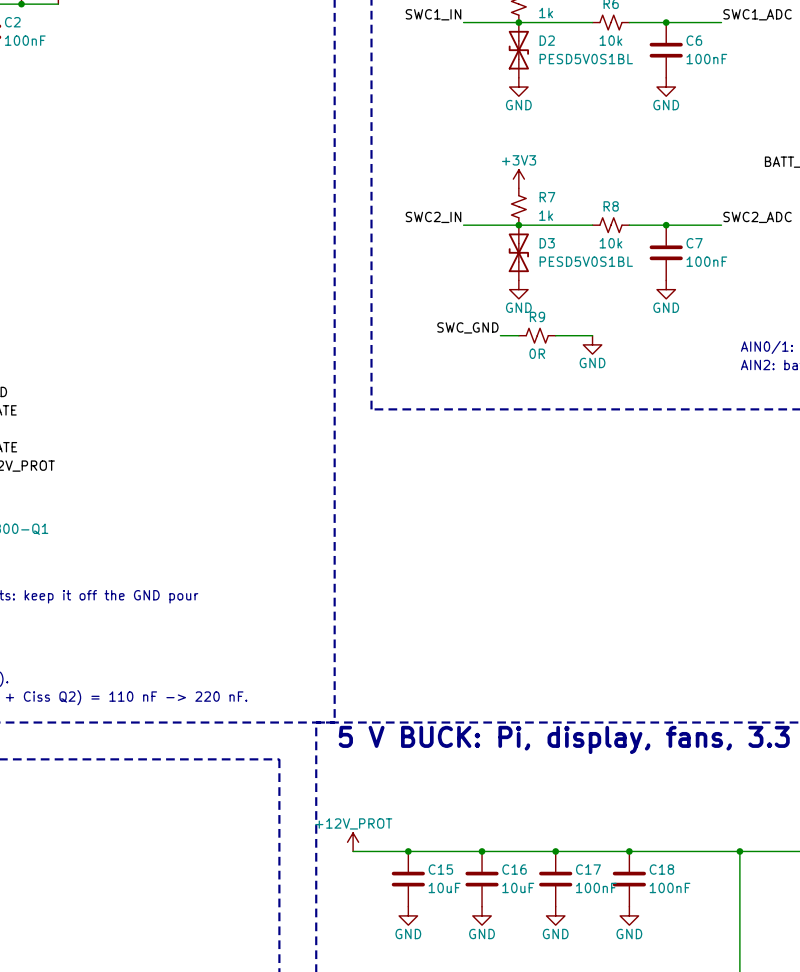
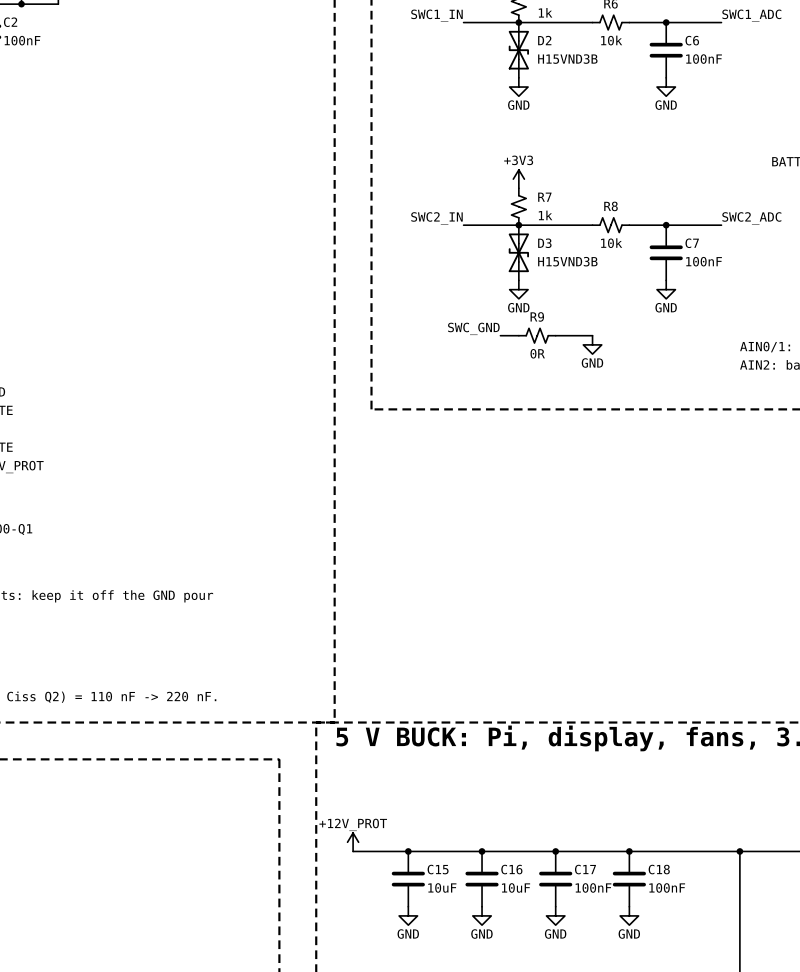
D2 value: PESD5V0S1BL (586, 59) -> H15VND3B (567, 59)
D3 value: PESD5V0S1BL (586, 261) -> H15VND3B (567, 261)

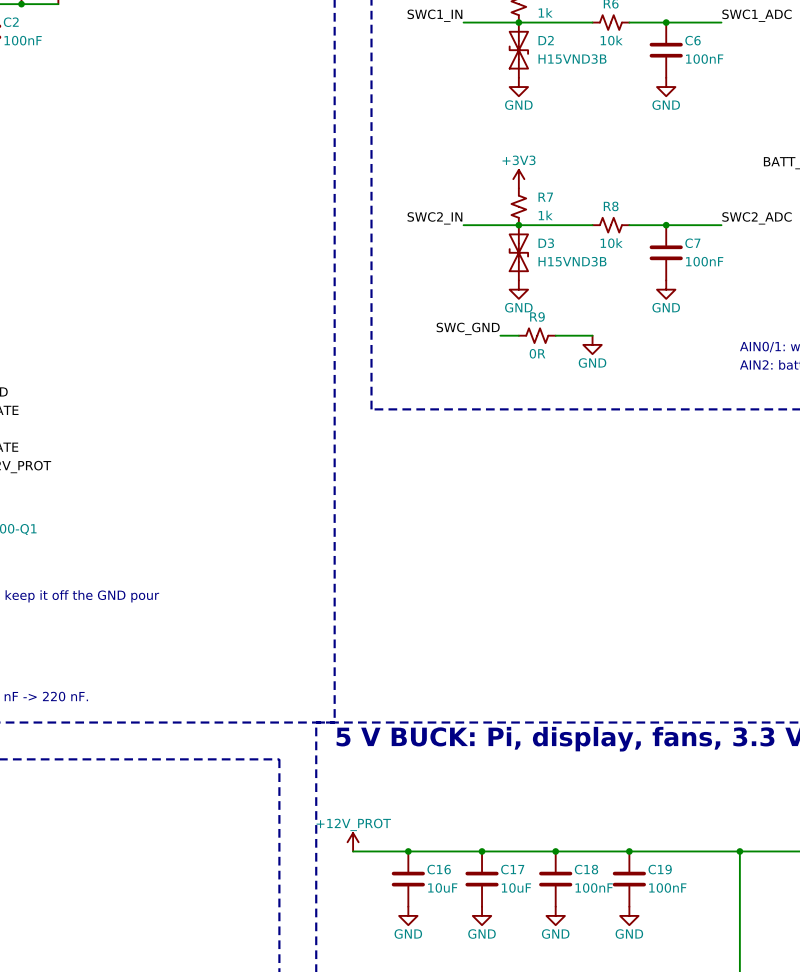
C15 name: C15 (438, 869) -> C16 (439, 869)
C16 name: C16 (511, 869) -> C17 (512, 869)
C17 name: C17 (585, 869) -> C18 (586, 869)
C18 name: C18 (659, 869) -> C19 (660, 869)

